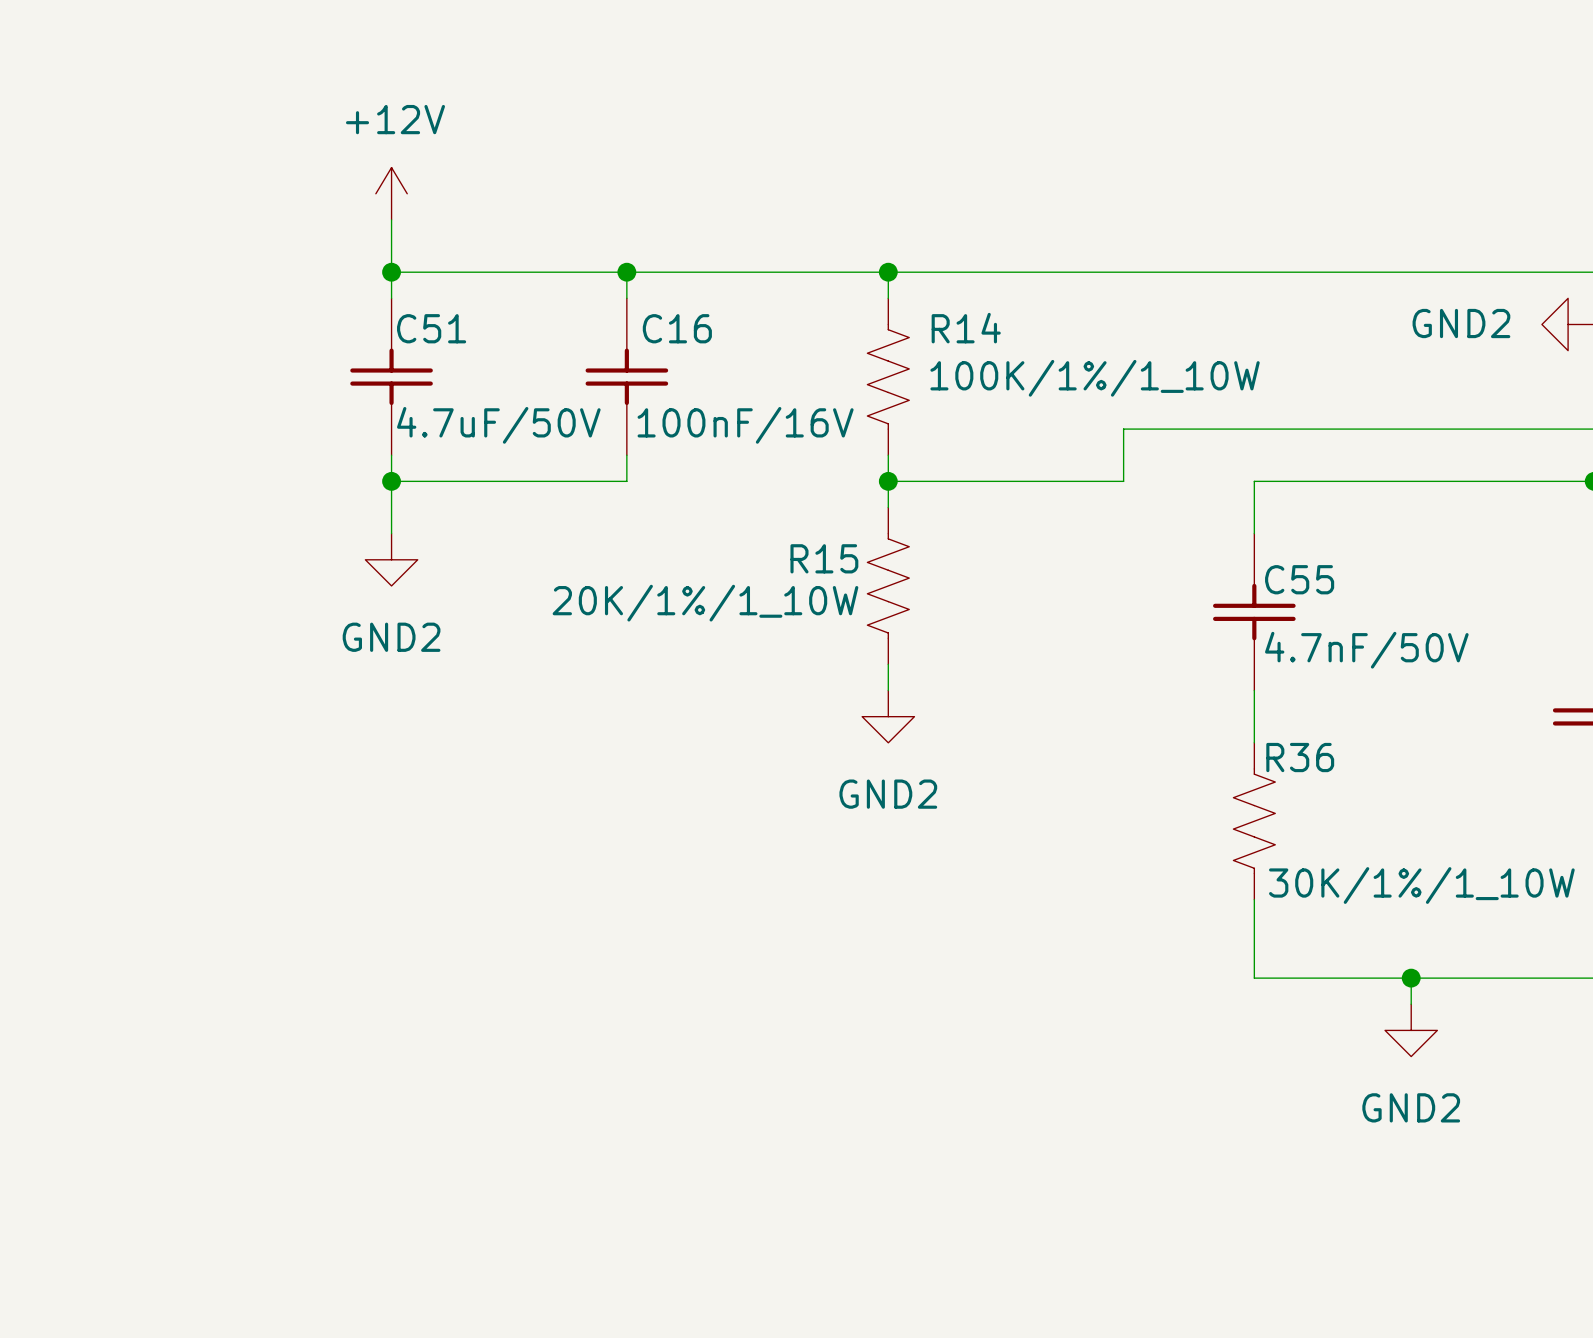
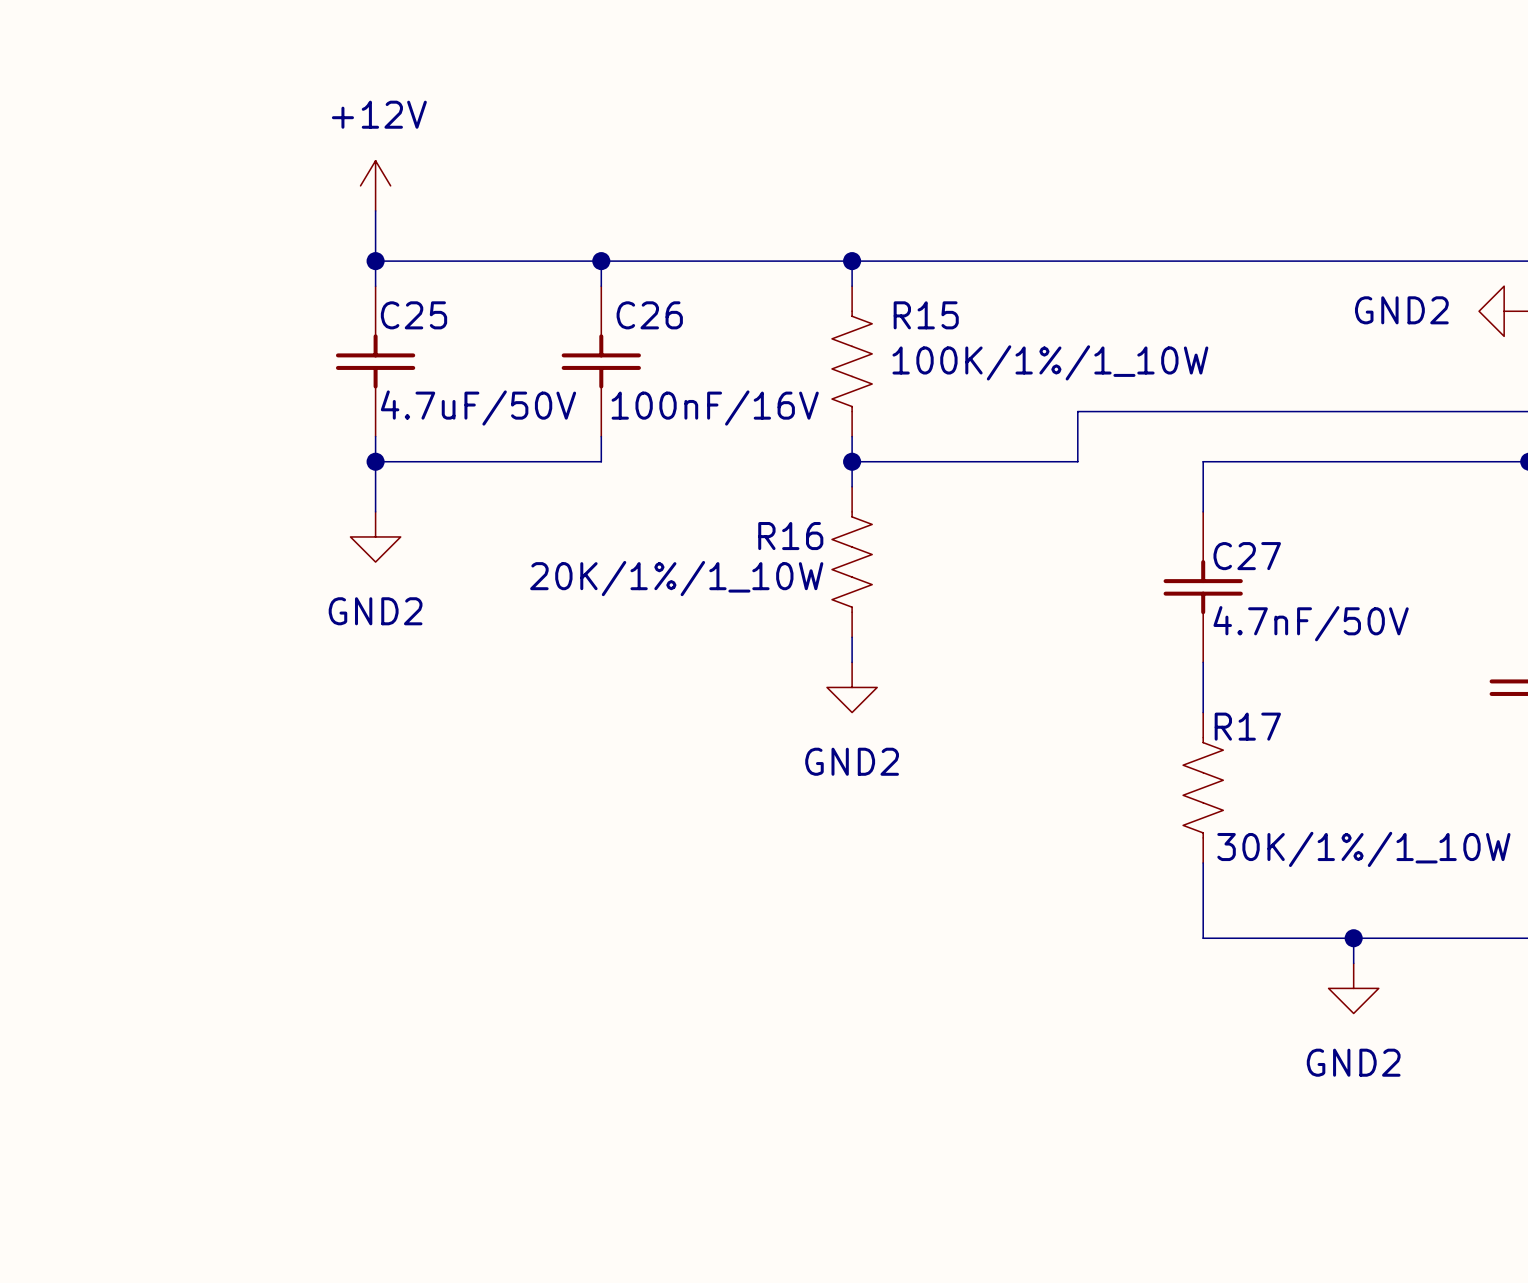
C51 name: C51 (431, 328) -> C25 (413, 315)
C16 name: C16 (677, 328) -> C26 (649, 315)
R14 name: R14 (966, 328) -> R15 (926, 315)
R15 name: R15 (824, 558) -> R16 (790, 536)
C55 name: C55 (1299, 579) -> C27 (1247, 556)
R36 name: R36 (1300, 757) -> R17 (1247, 726)

